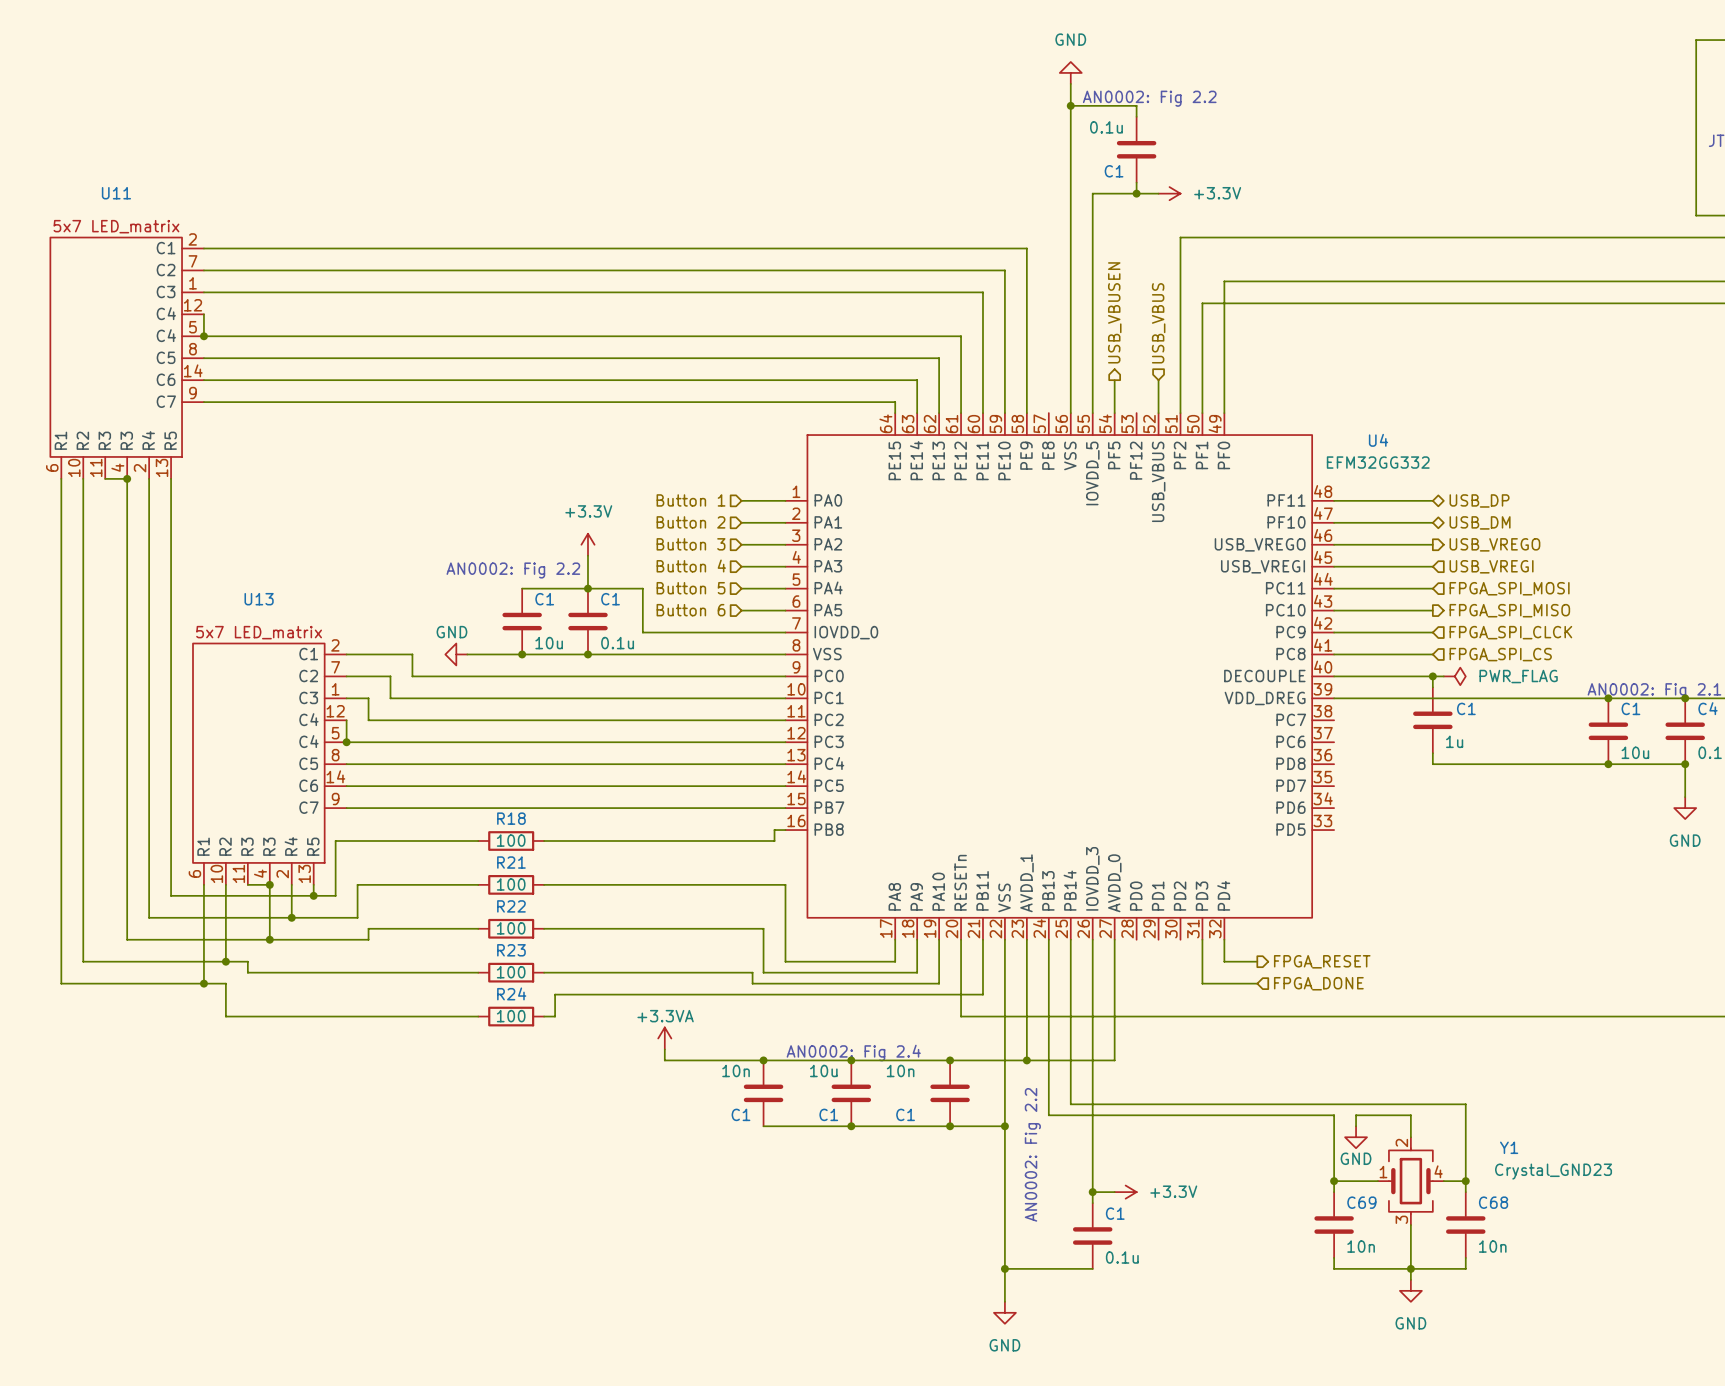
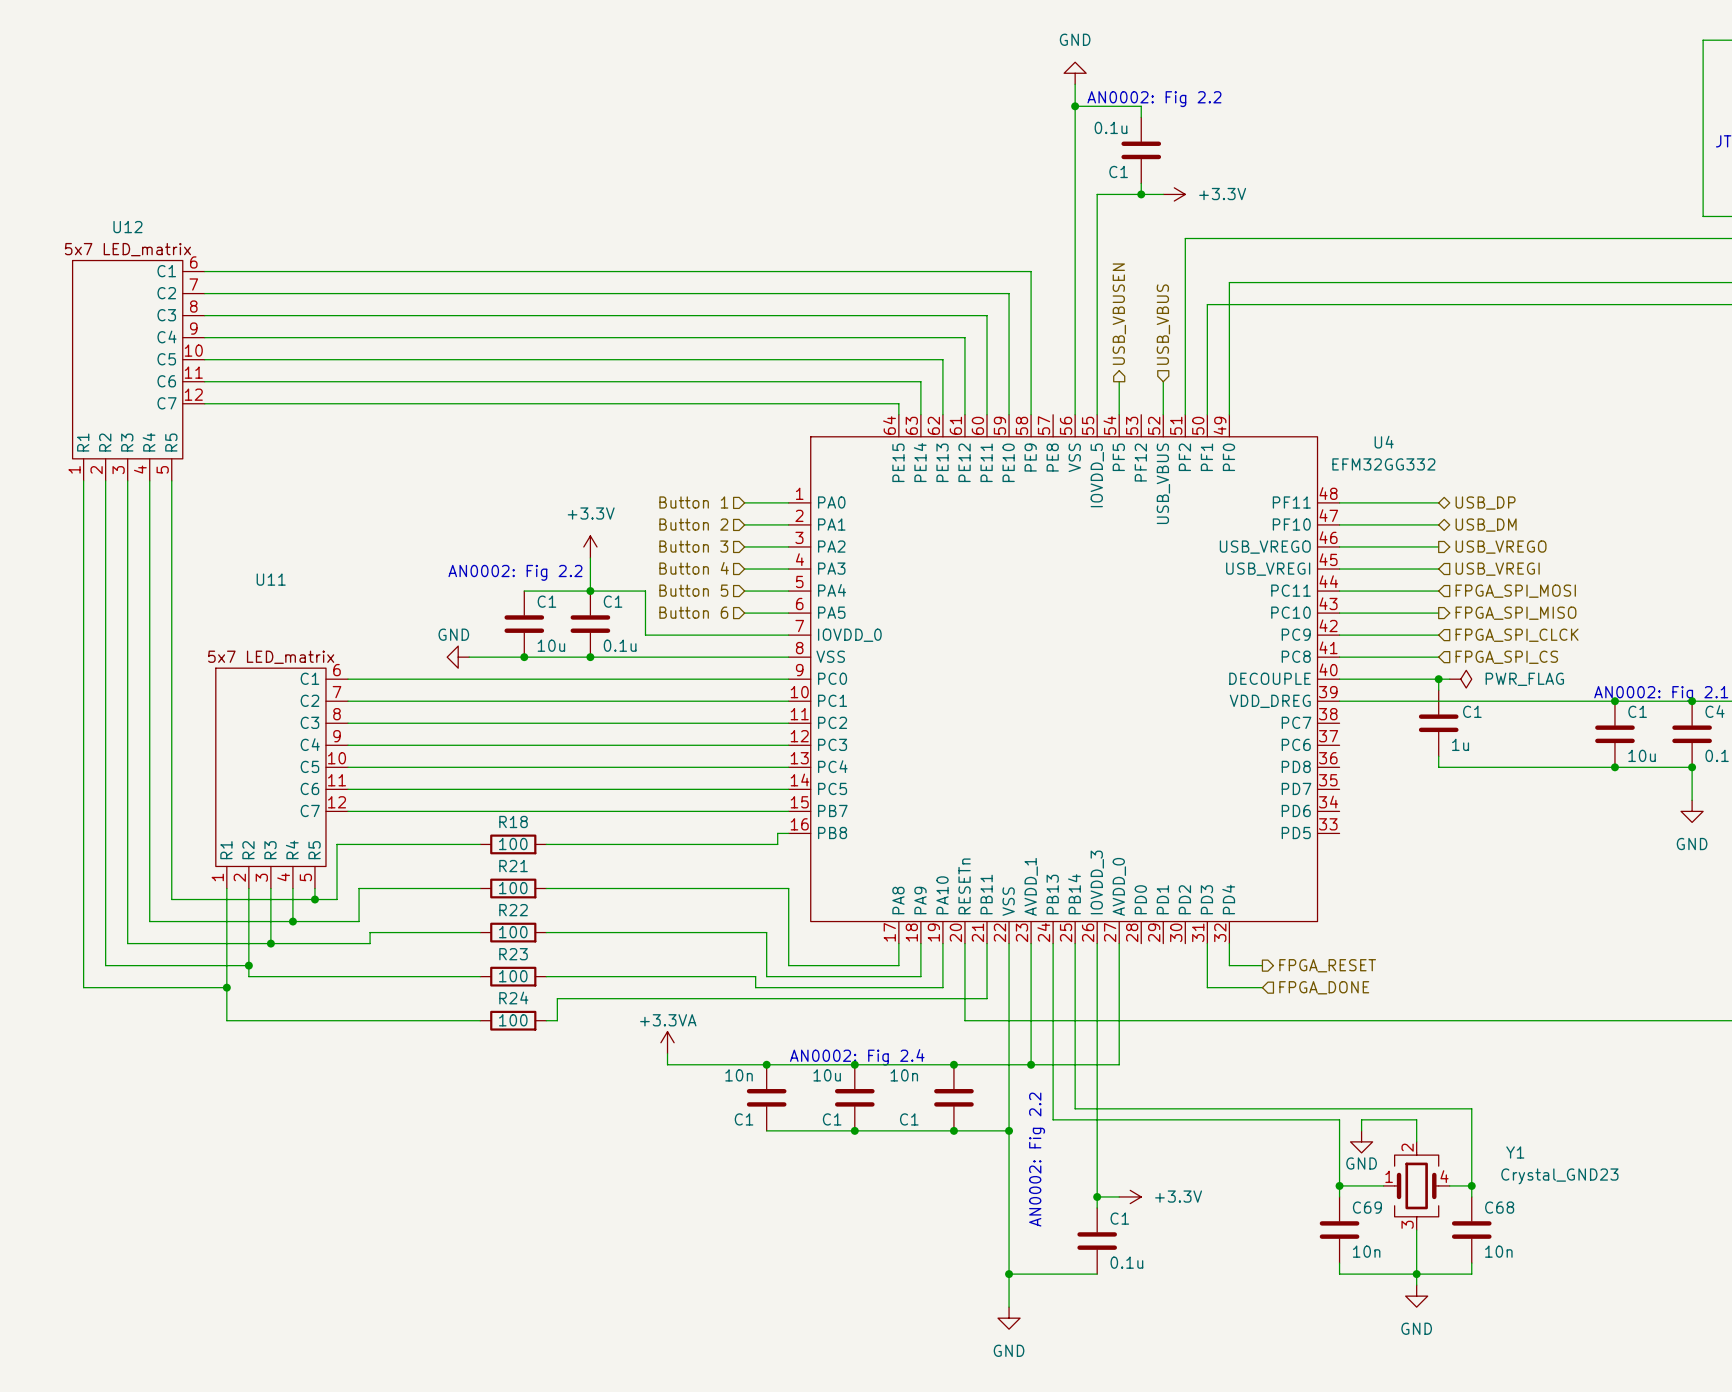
U11 name position: U11 (116, 193) -> U11 (271, 579)
U11 symbol: [50, 237, 204, 479] -> [215, 668, 349, 889]
wire: (203, 248) (1026, 248) (1026, 270) -> (1009, 271) (1031, 271)
wire: (1004, 270) (1004, 292) -> (987, 293) (1009, 293)
wire: (982, 292) (982, 314) -> (204, 315) (987, 315)
wire: (203, 314) (203, 336) -> none
junction: (203, 336) -> none
U12: none -> (138, 370)
wire: (61, 478) (61, 983) (83, 983) -> none
wire: (105, 478) (127, 478) -> (105, 480) (105, 965)
junction: (127, 478) -> none
wire: (346, 654) (412, 654) (412, 676) -> none
wire: (390, 676) (390, 698) -> (392, 679) (414, 679)
wire: (368, 698) (368, 720) -> (370, 701) (392, 701)
wire: (346, 720) (346, 742) -> (348, 723) (370, 723)
junction: (346, 742) -> none
U13: (269, 764) -> none
wire: (203, 884) (203, 983) -> none
wire: (247, 884) (269, 884) -> (248, 888) (248, 965)
junction: (269, 884) -> none
wire: (83, 961) (105, 961) -> (83, 965) (83, 987)
wire: none -> (226, 965) (226, 987)
junction: (225, 961) -> none
junction: none -> (248, 965)
junction: (203, 983) -> none
junction: none -> (226, 987)

